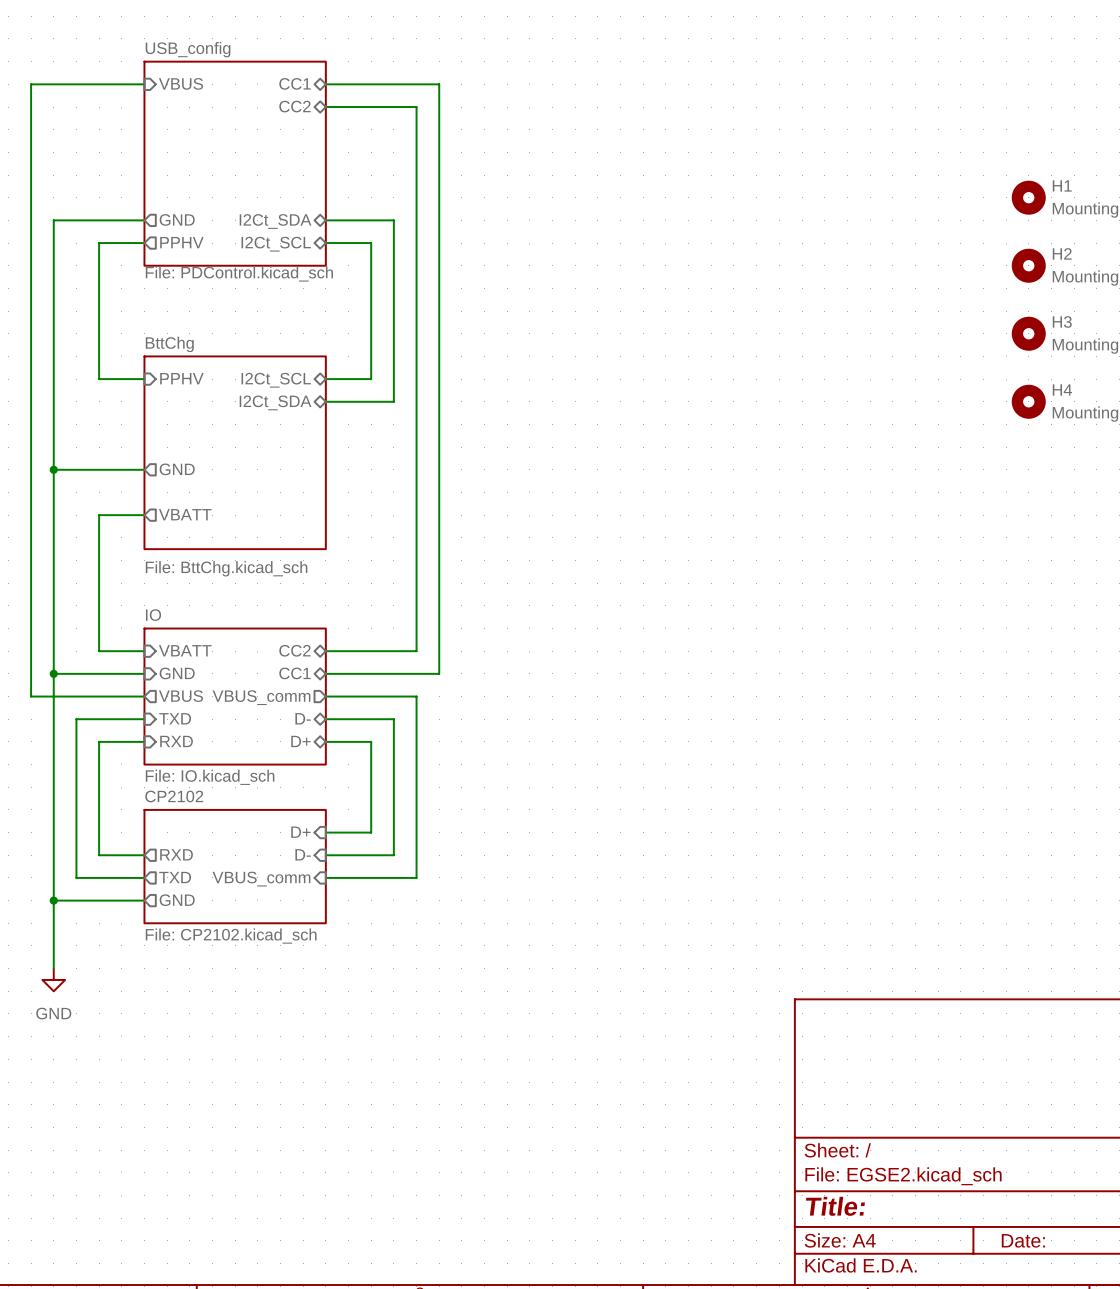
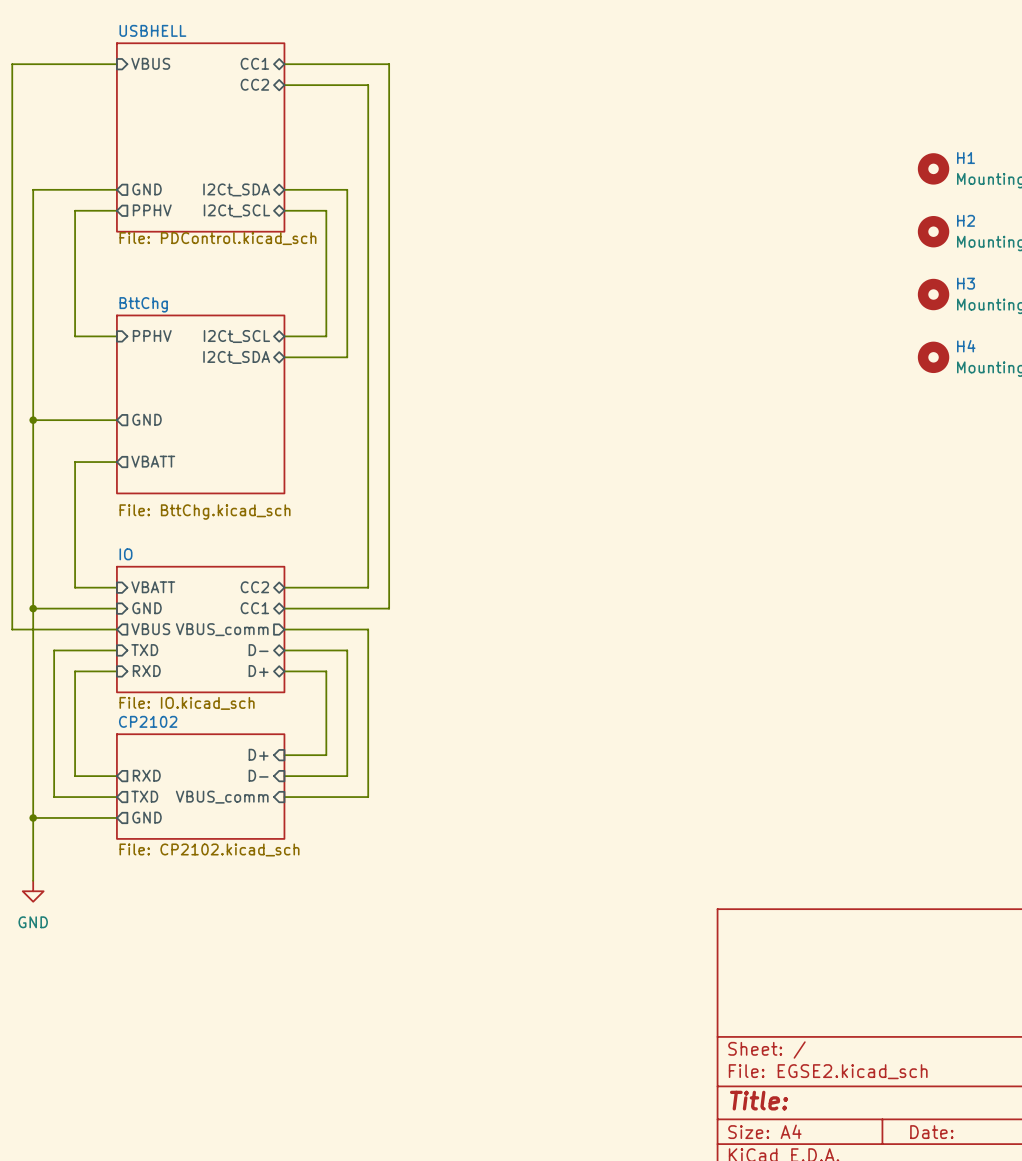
sheet USB_config name: USB_config (188, 49) -> USBHELL (152, 30)

